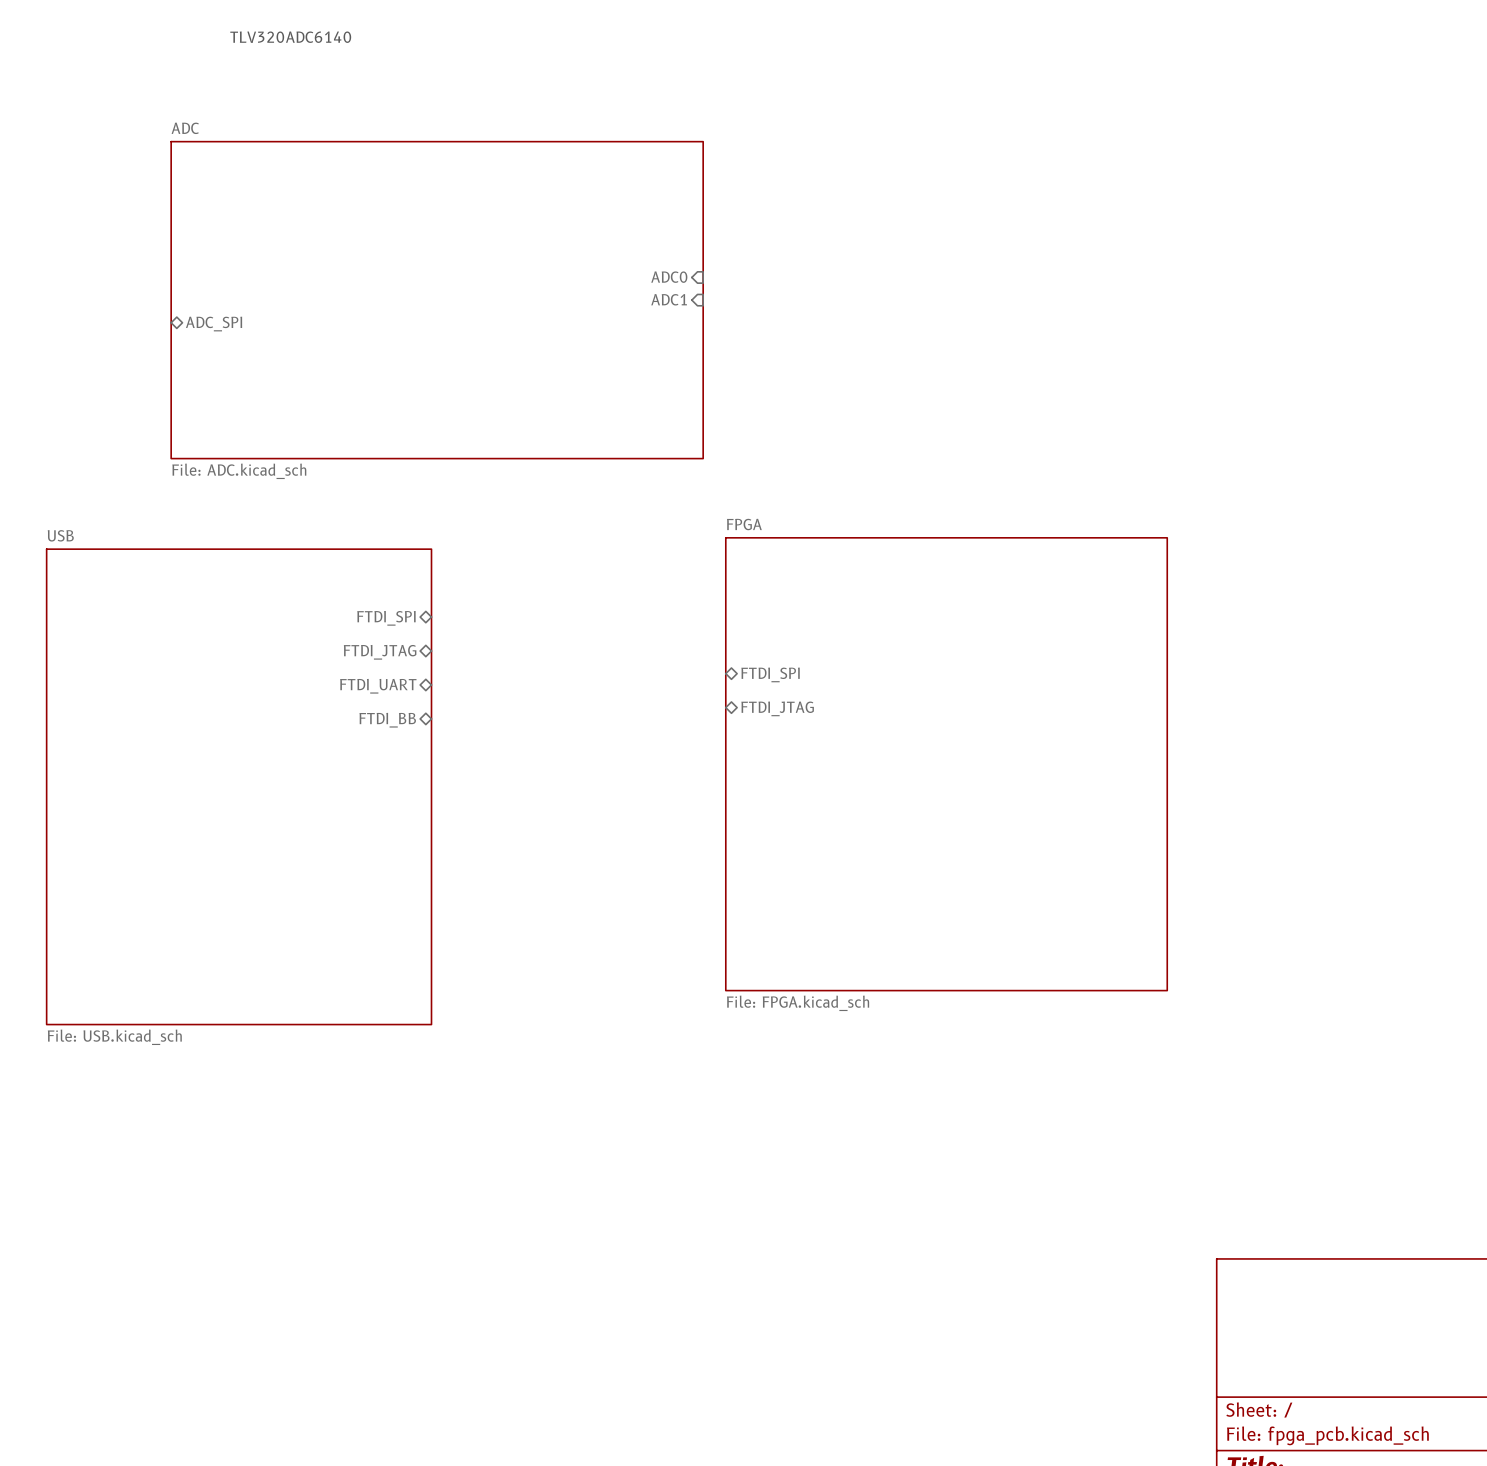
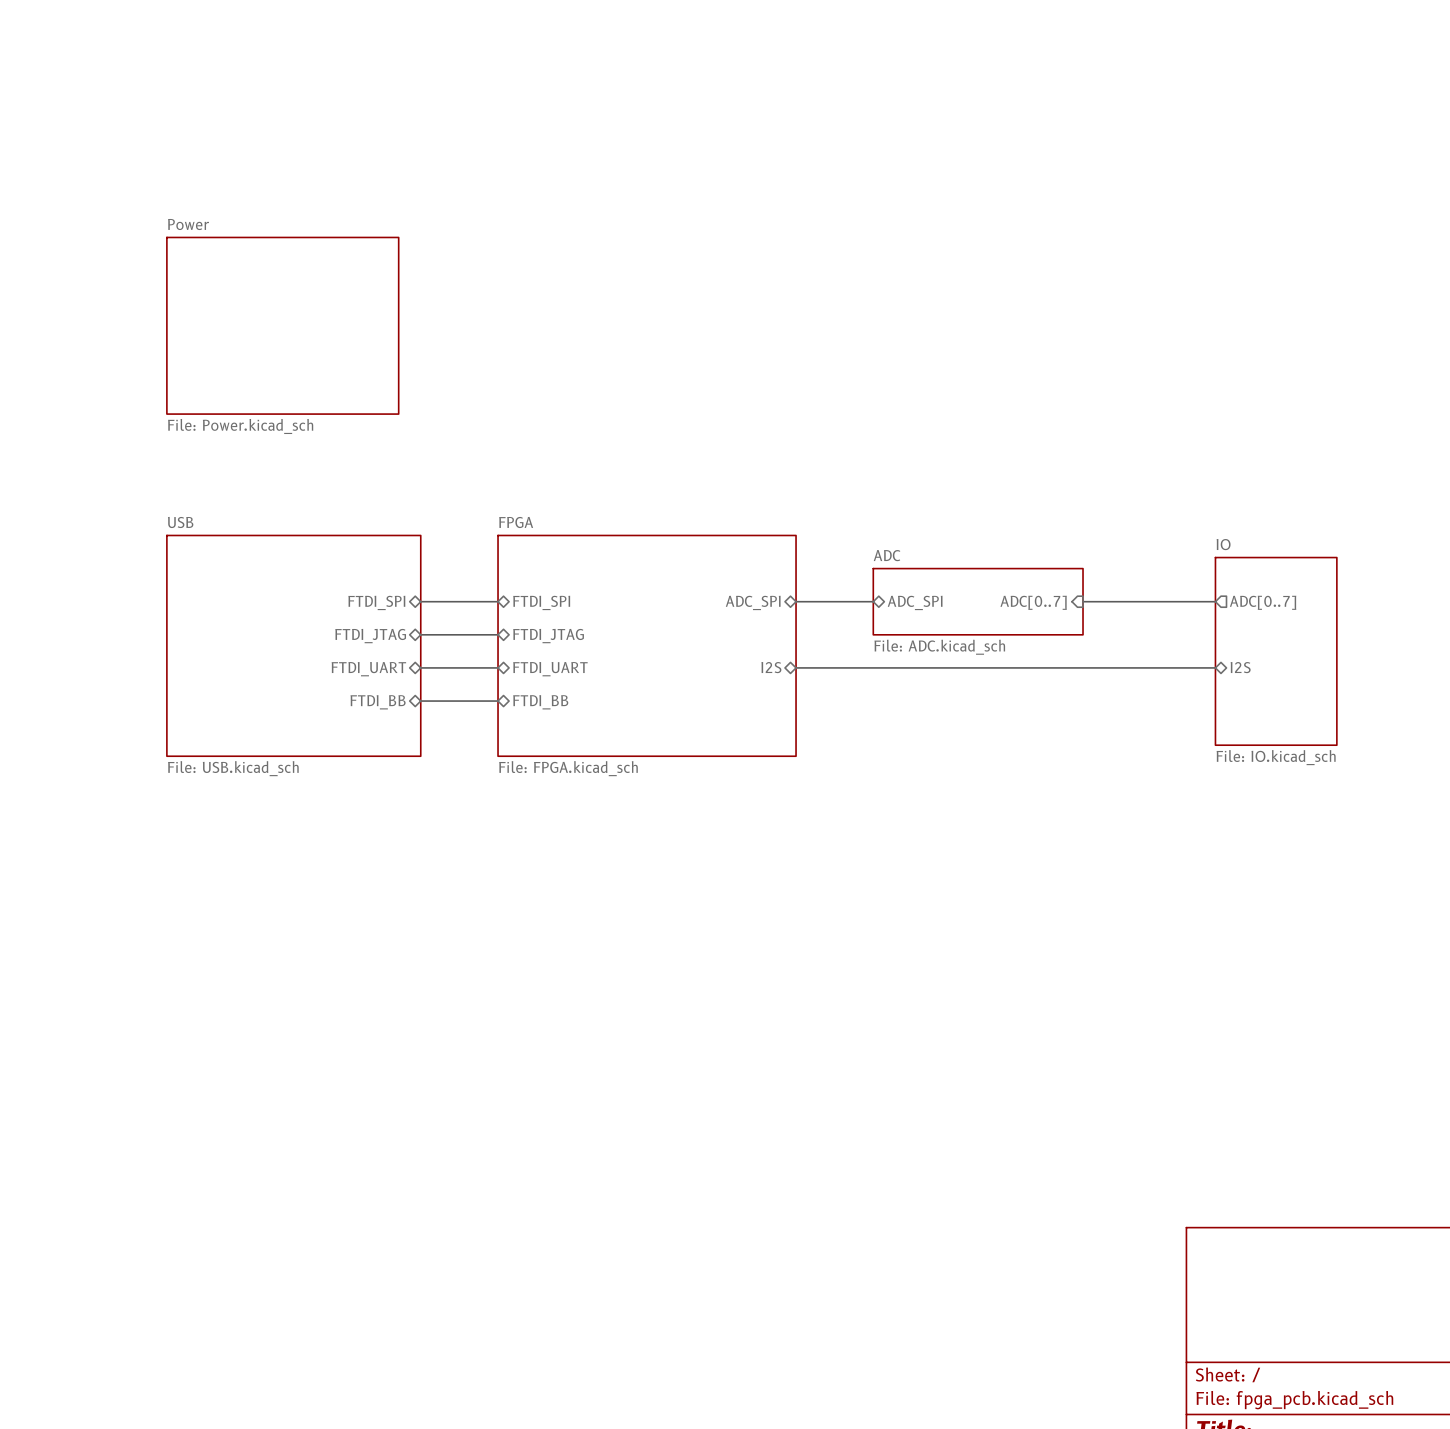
text: TLV320ADC6140 (290, 37) -> none
sheet pin: ADC0 (669, 277) -> none
sheet pin: ADC1 (669, 299) -> none
sheet ADC: File: ADC.kicad_sch (437, 300) -> none
sheet pin: ADC_SPI (214, 324) -> none
sheet Power: none -> File: Power.kicad_sch (282, 325)
bus: none -> (420, 601) (498, 601)
bus: none -> (796, 601) (873, 601)
sheet ADC: none -> File: ADC.kicad_sch (978, 601)
bus: none -> (1083, 601) (1215, 601)
sheet pin: none -> ADC_SPI (753, 602)
sheet pin: none -> ADC_SPI (915, 602)
sheet pin: none -> ADC[0..7] (1033, 602)
sheet pin: none -> ADC[0..7] (1263, 602)
bus: none -> (420, 634) (498, 634)
sheet USB: none -> File: USB.kicad_sch (293, 645)
sheet FPGA: none -> File: FPGA.kicad_sch (647, 645)
sheet IO: none -> File: IO.kicad_sch (1276, 651)
sheet pin position: FTDI_SPI (770, 674) -> FTDI_SPI (541, 602)
bus: none -> (420, 667) (498, 667)
sheet pin: none -> I2S (771, 667)
bus: none -> (796, 667) (1215, 667)
sheet pin: none -> I2S (1240, 667)
sheet pin: none -> FTDI_UART (550, 669)
sheet pin position: FTDI_JTAG (777, 708) -> FTDI_JTAG (548, 636)
bus: none -> (420, 701) (498, 701)
sheet pin: none -> FTDI_BB (540, 702)
sheet FPGA: File: FPGA.kicad_sch (946, 764) -> none
sheet USB: File: USB.kicad_sch (239, 786) -> none

